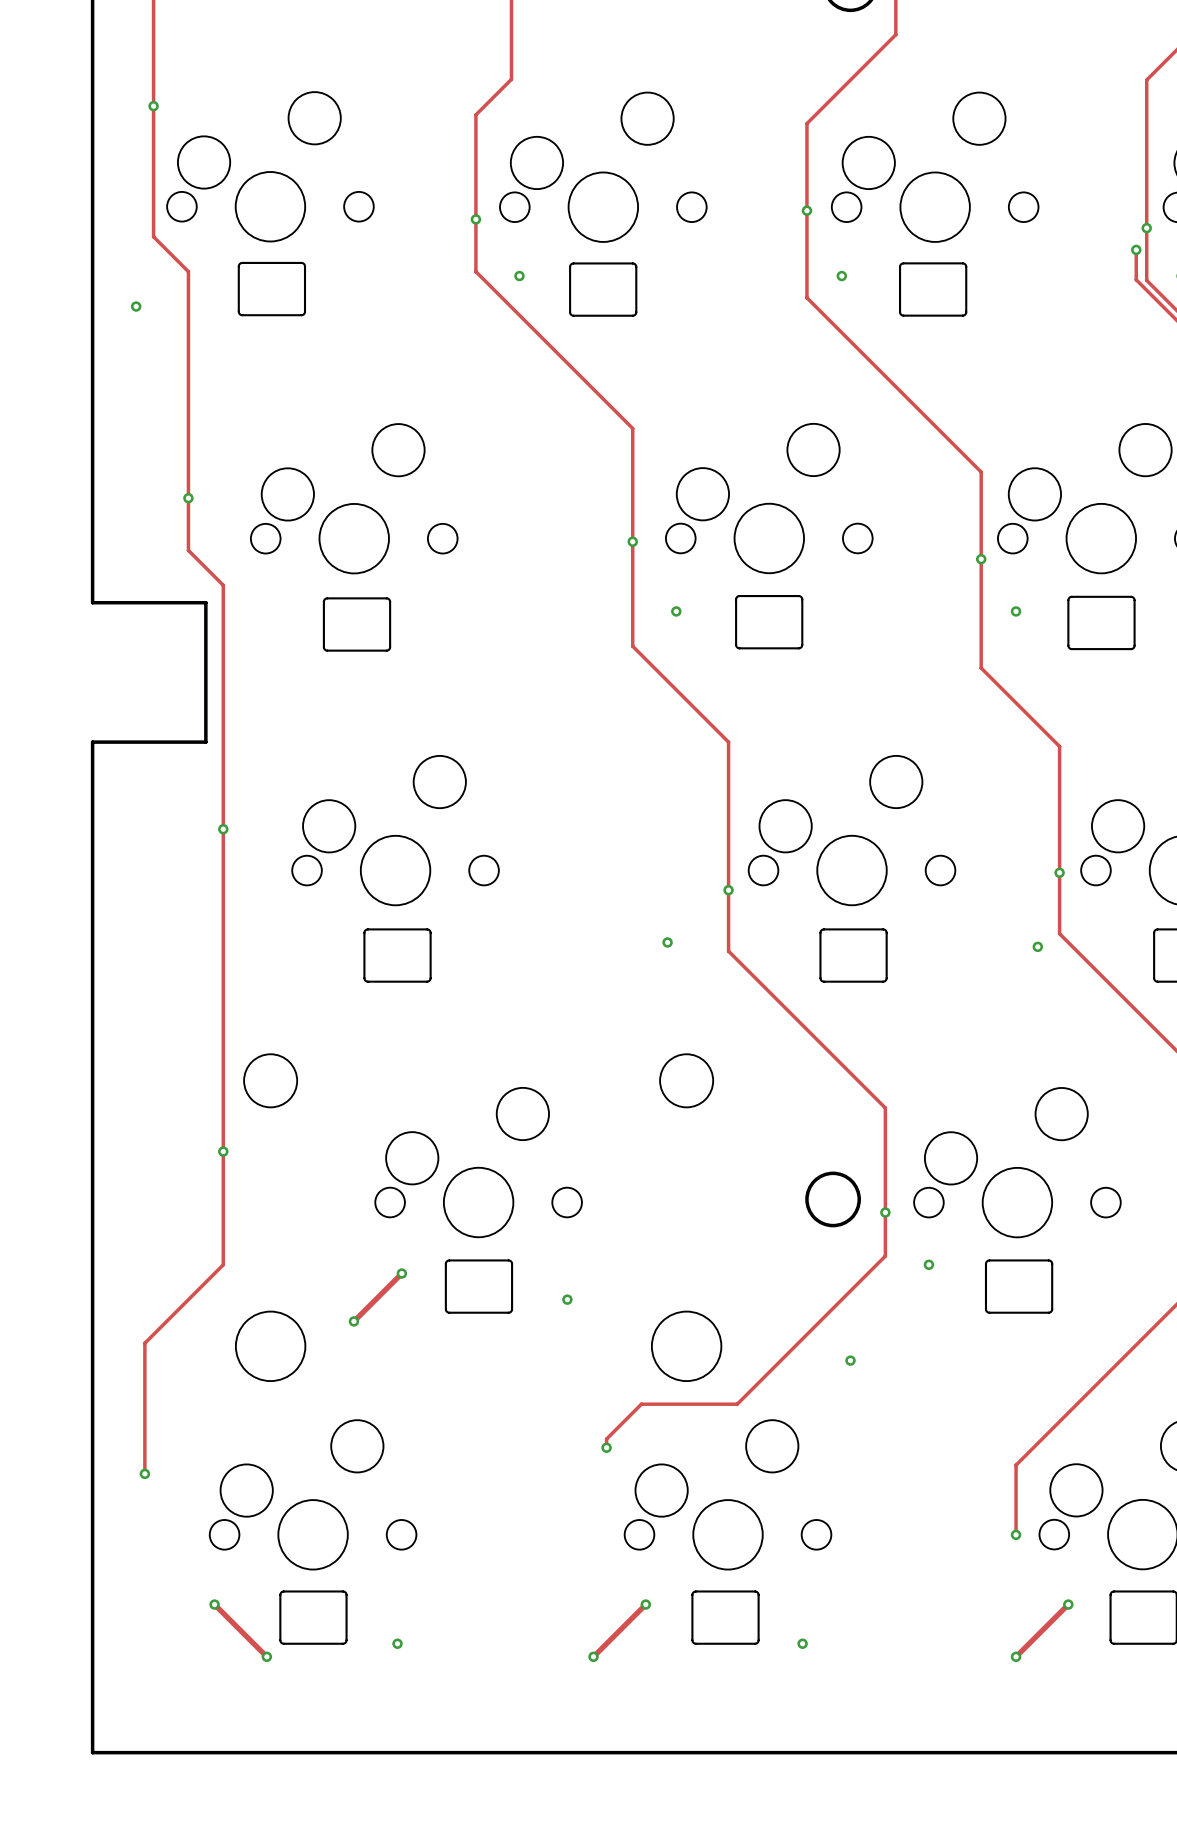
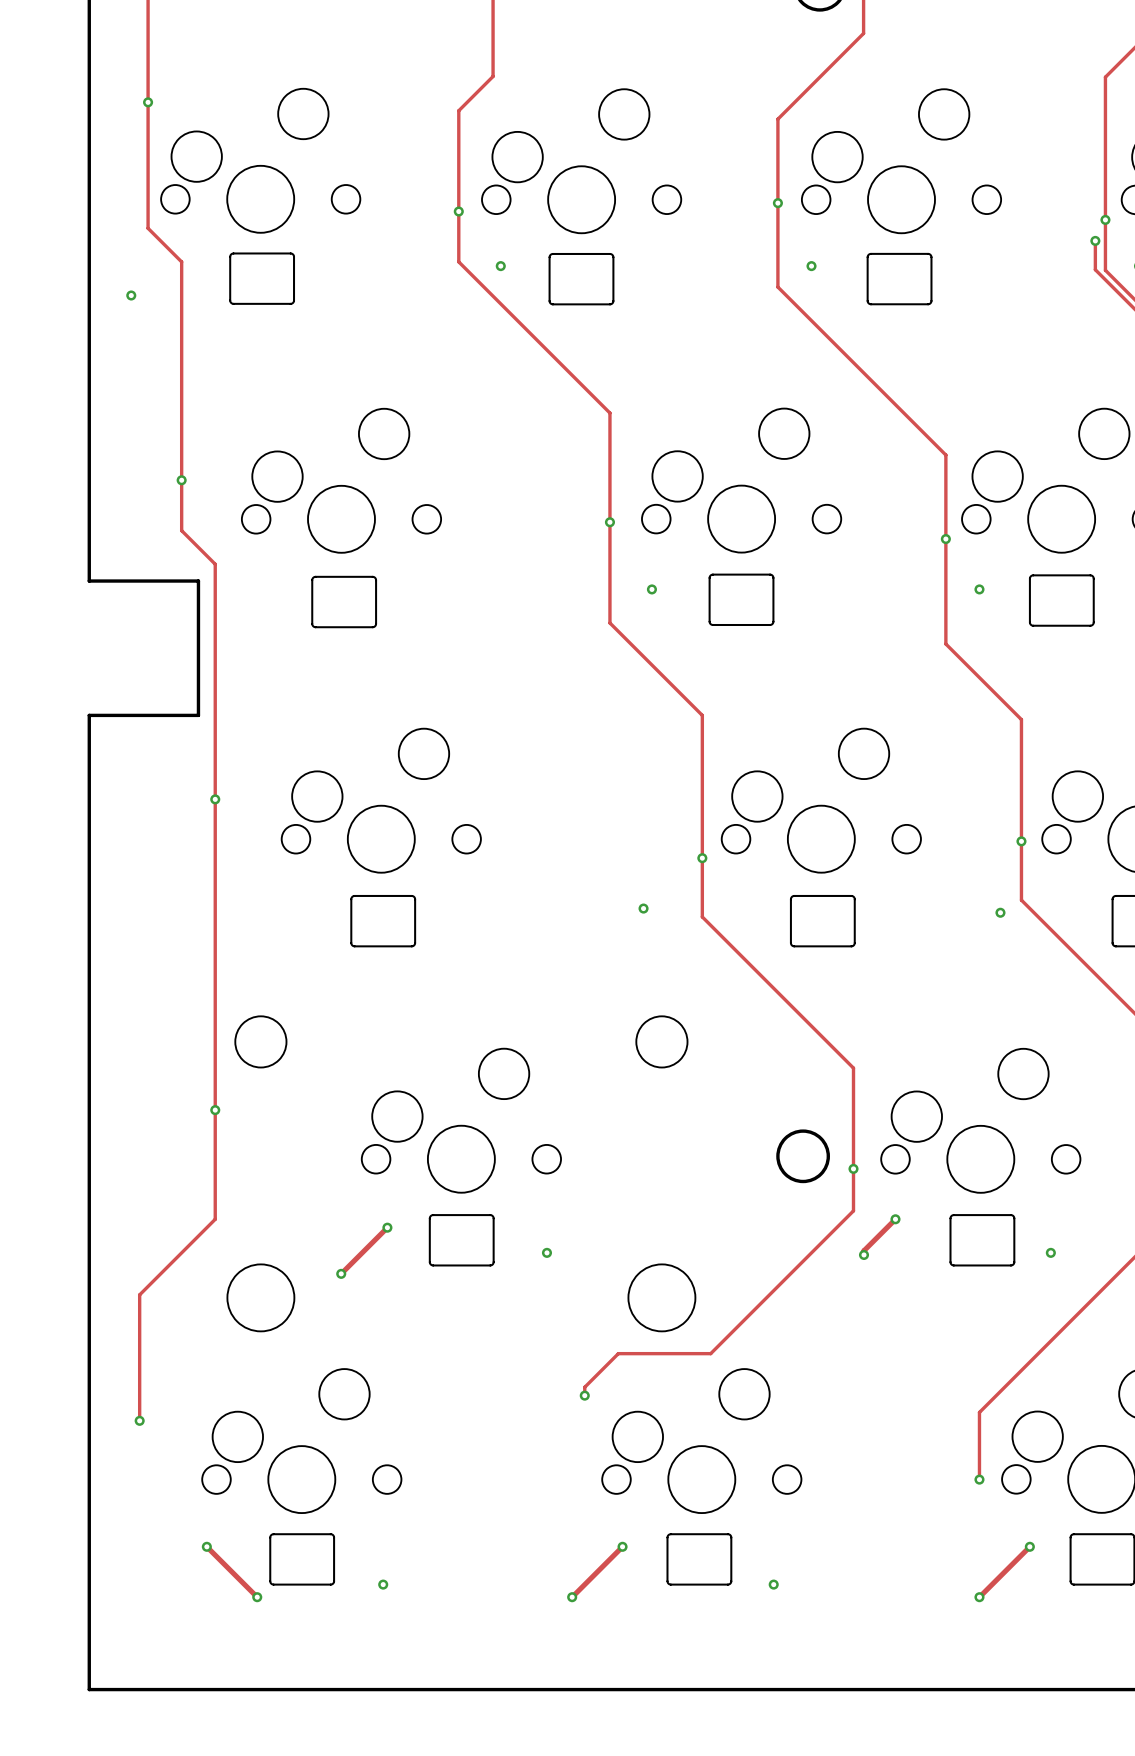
track: none -> (895, 1219) (864, 1250) (864, 1254)
via: none -> (1050, 1252)
via position: (850, 1360) -> (864, 1254)

